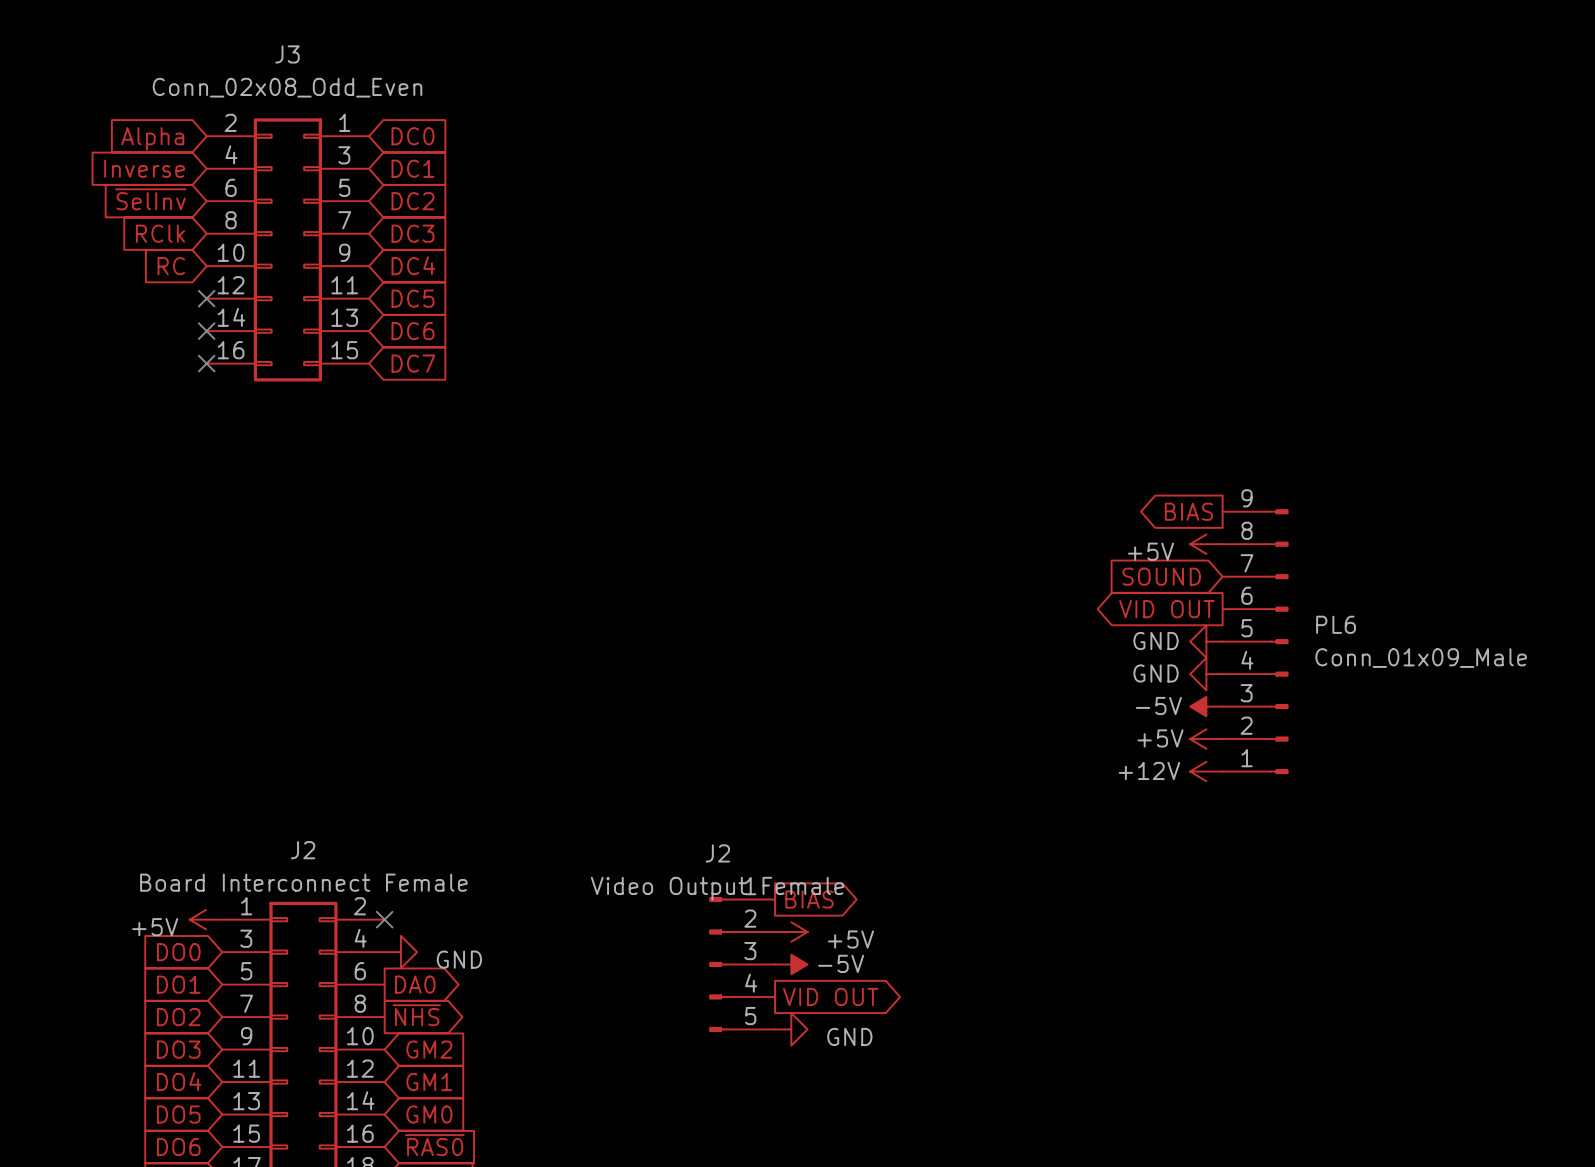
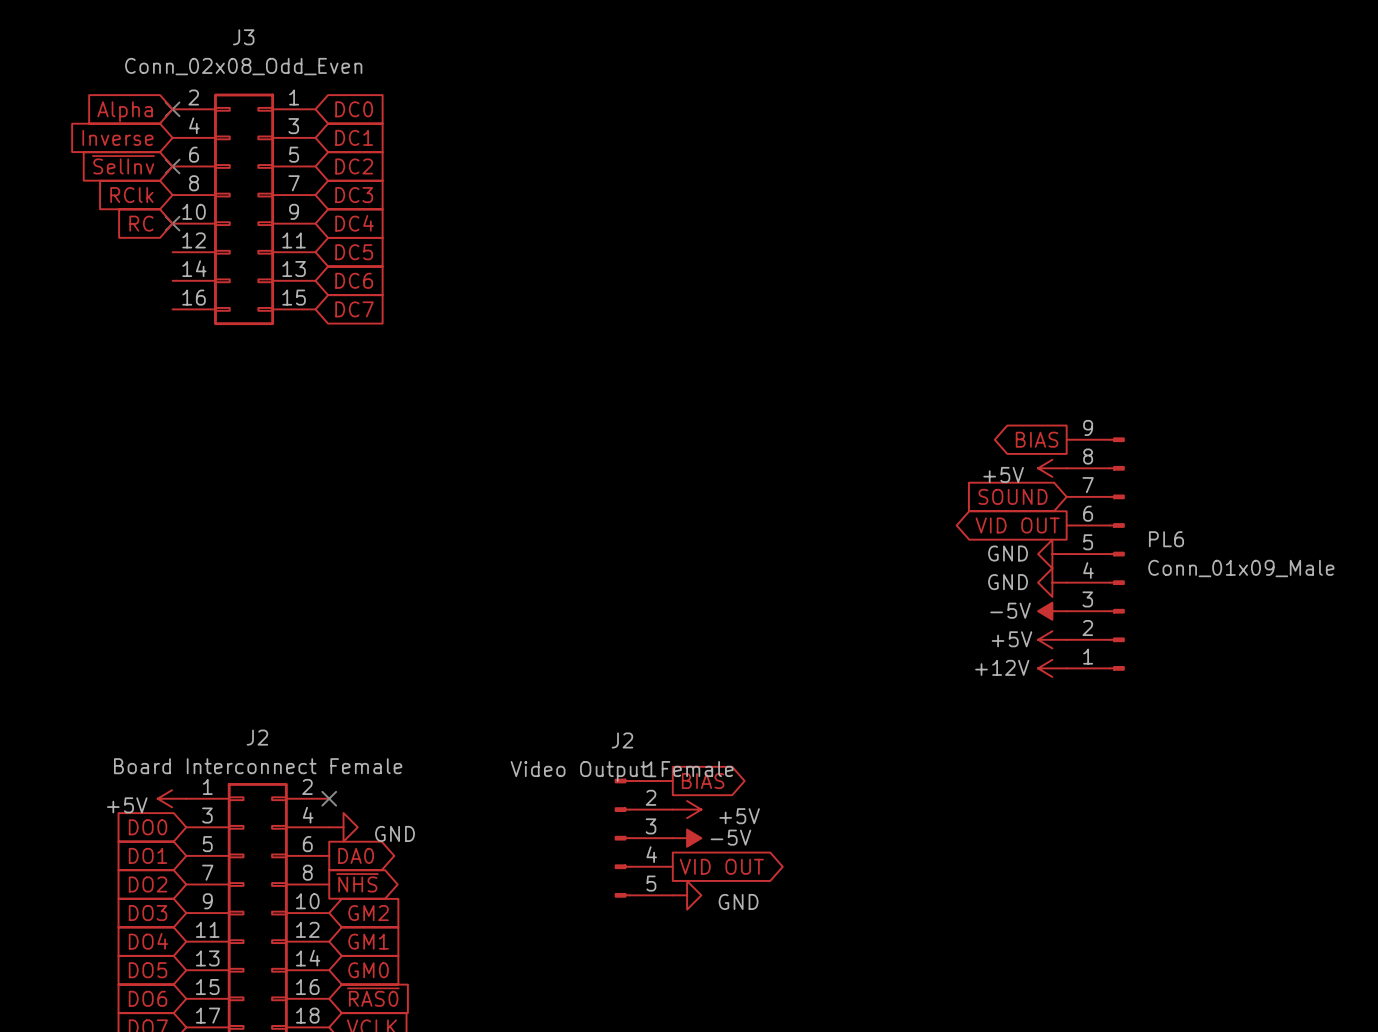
no-connect mark: none -> (172, 109)
no-connect mark: none -> (172, 166)
no-connect mark: none -> (172, 223)
no-connect mark: (206, 298) -> none
no-connect mark: (206, 331) -> none
no-connect mark: (206, 363) -> none

